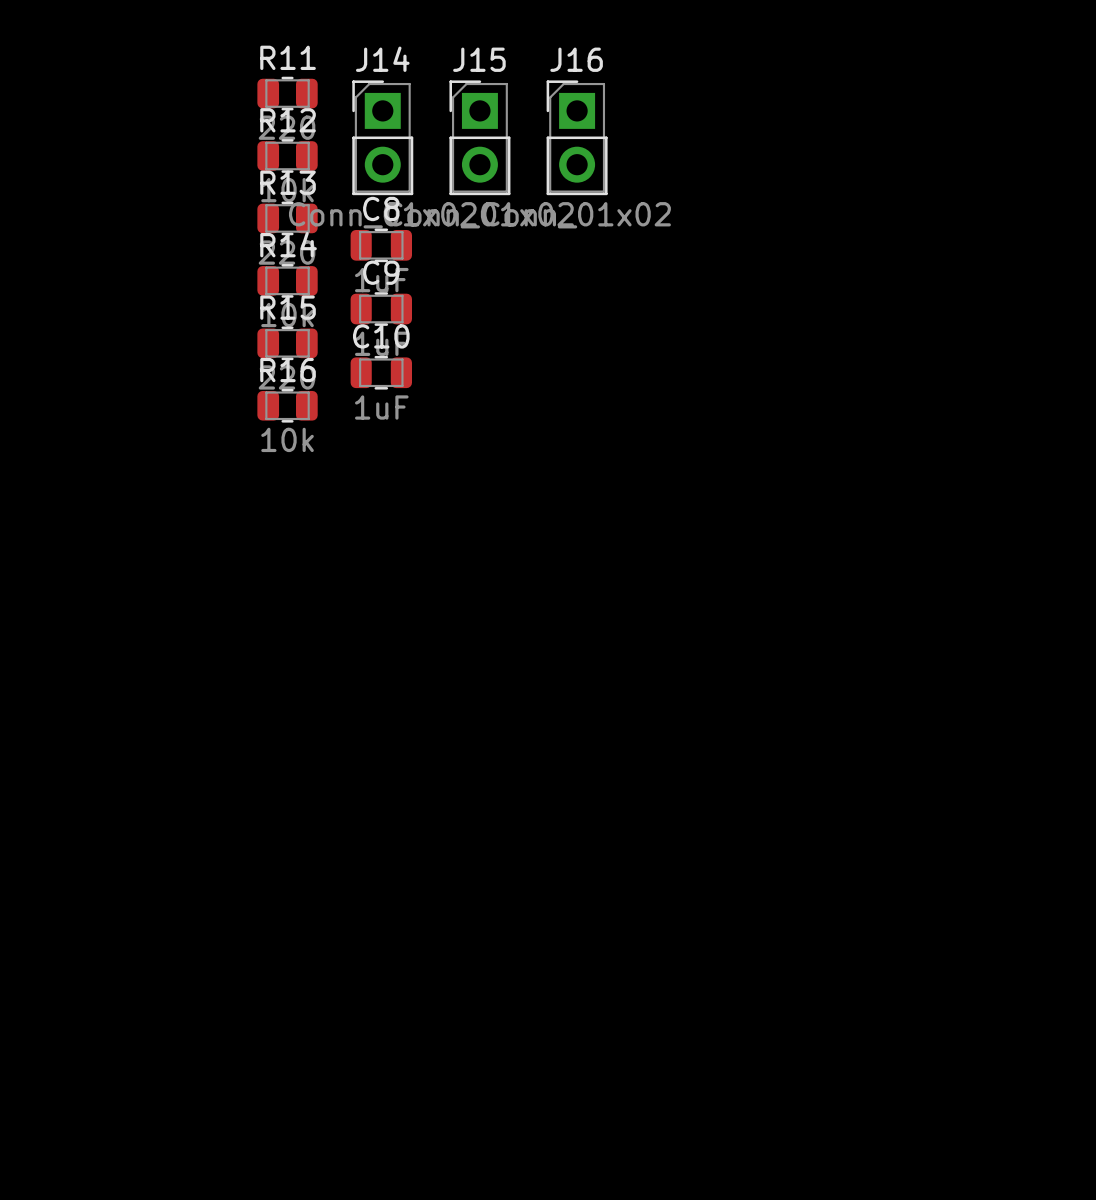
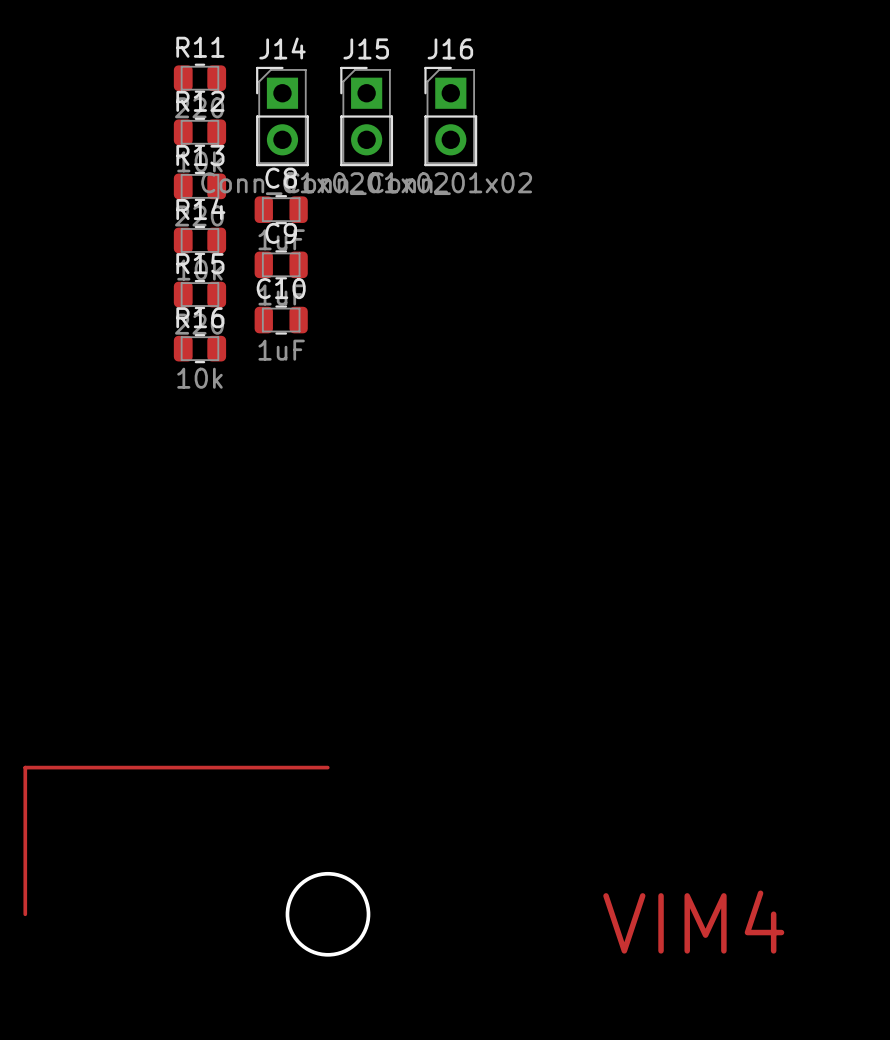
track: none -> (327, 767) (25, 767) (25, 914)
round board edge: none -> [285, 871, 371, 957]
text: none -> VIM4 (693, 922)

